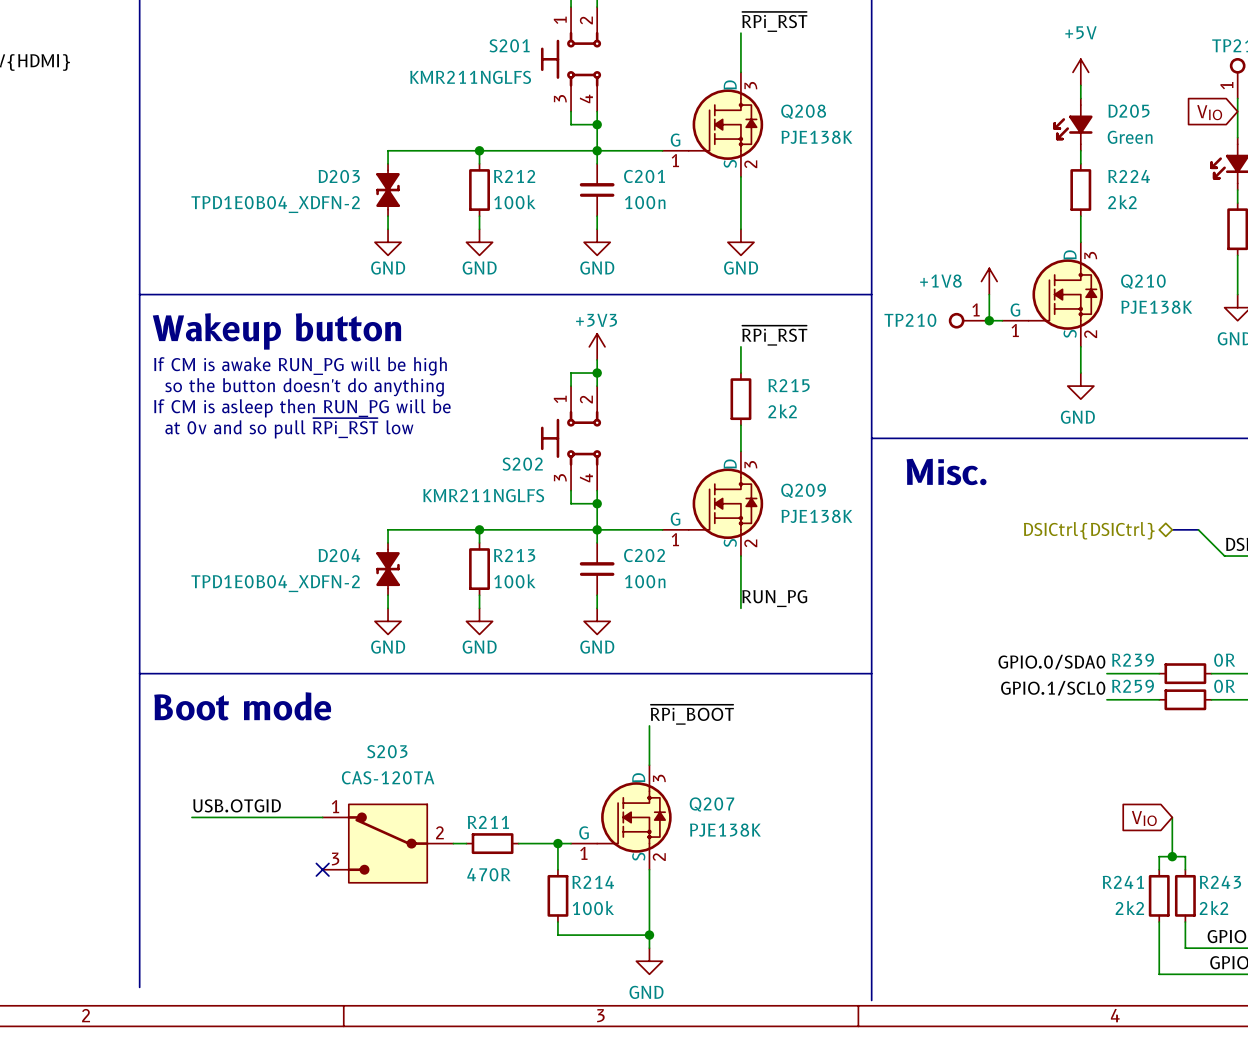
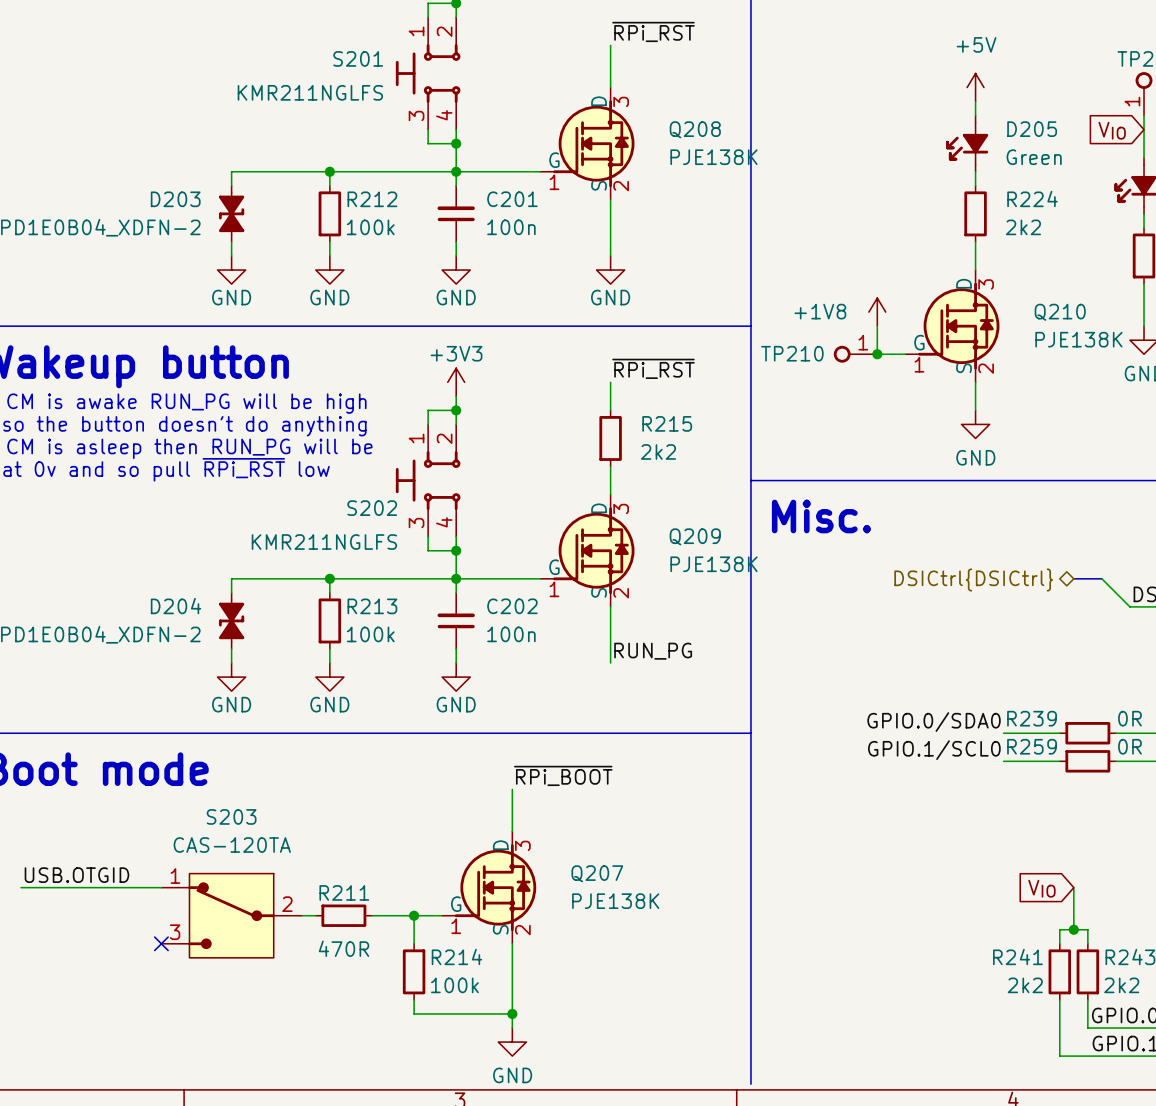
Q208 symbol: [662, 72, 764, 177] -> [540, 87, 635, 200]
Q210 symbol: [1002, 242, 1104, 347] -> [905, 270, 1000, 383]
Q209 symbol: [662, 451, 764, 557] -> [540, 494, 635, 607]
Q207 symbol: [571, 765, 672, 870] -> [442, 831, 537, 944]

